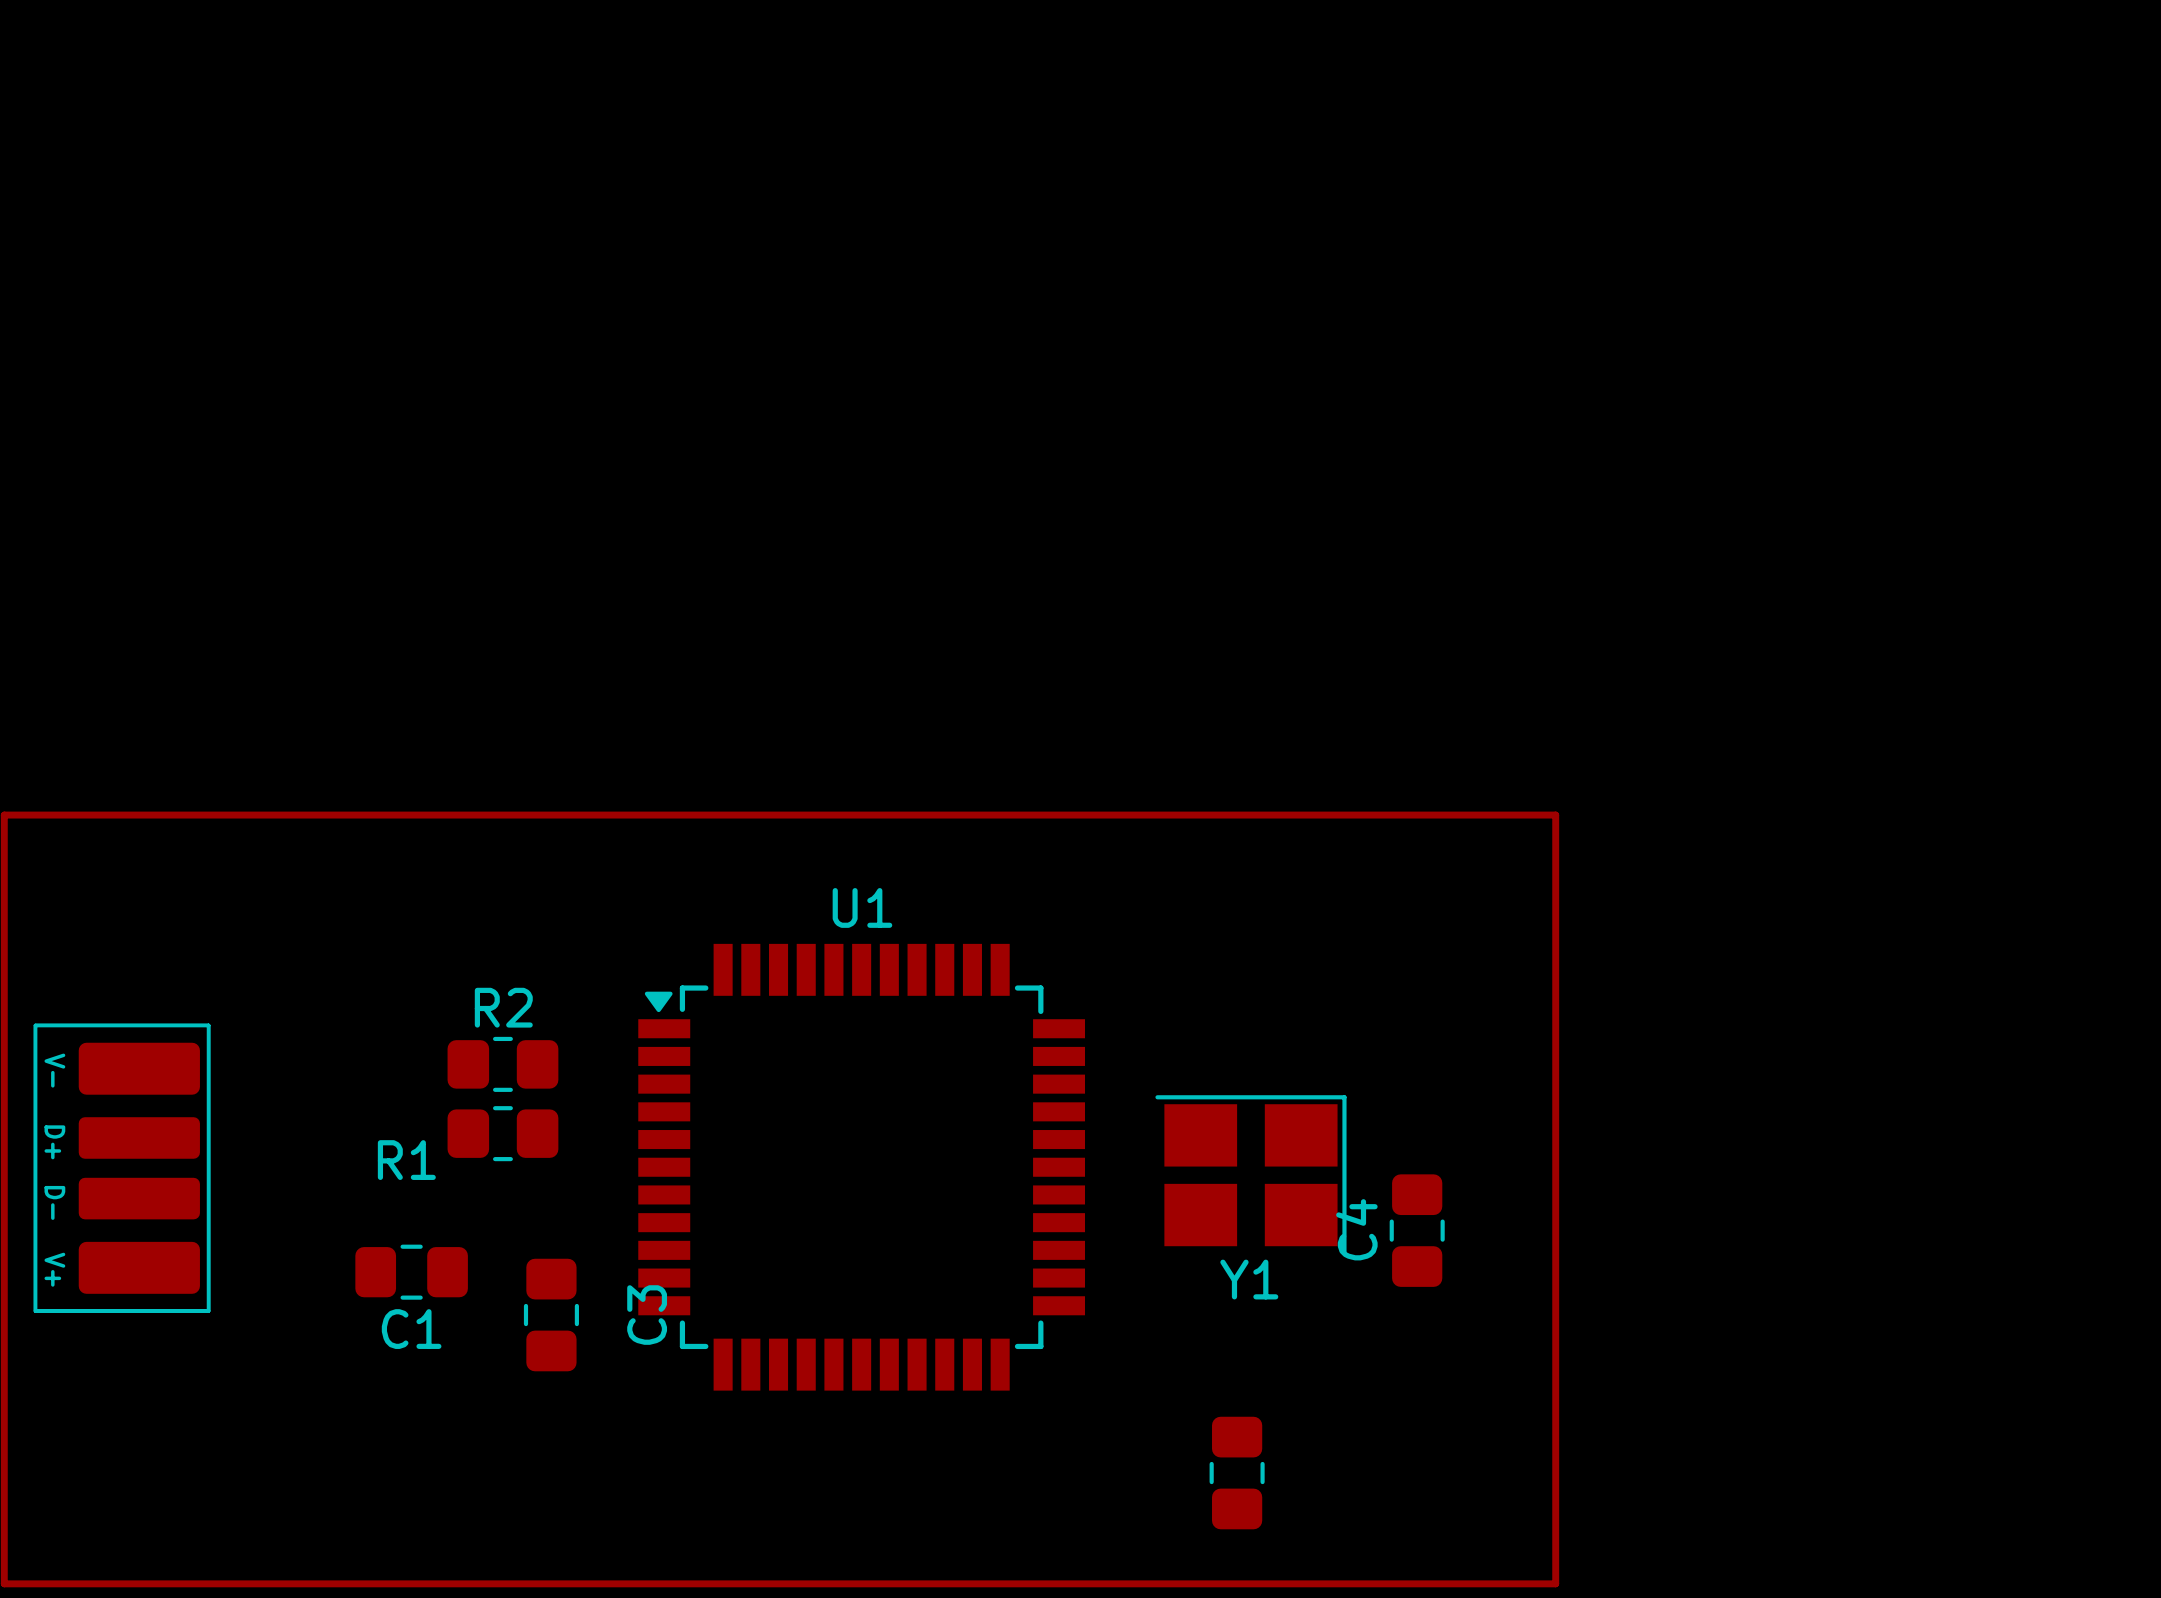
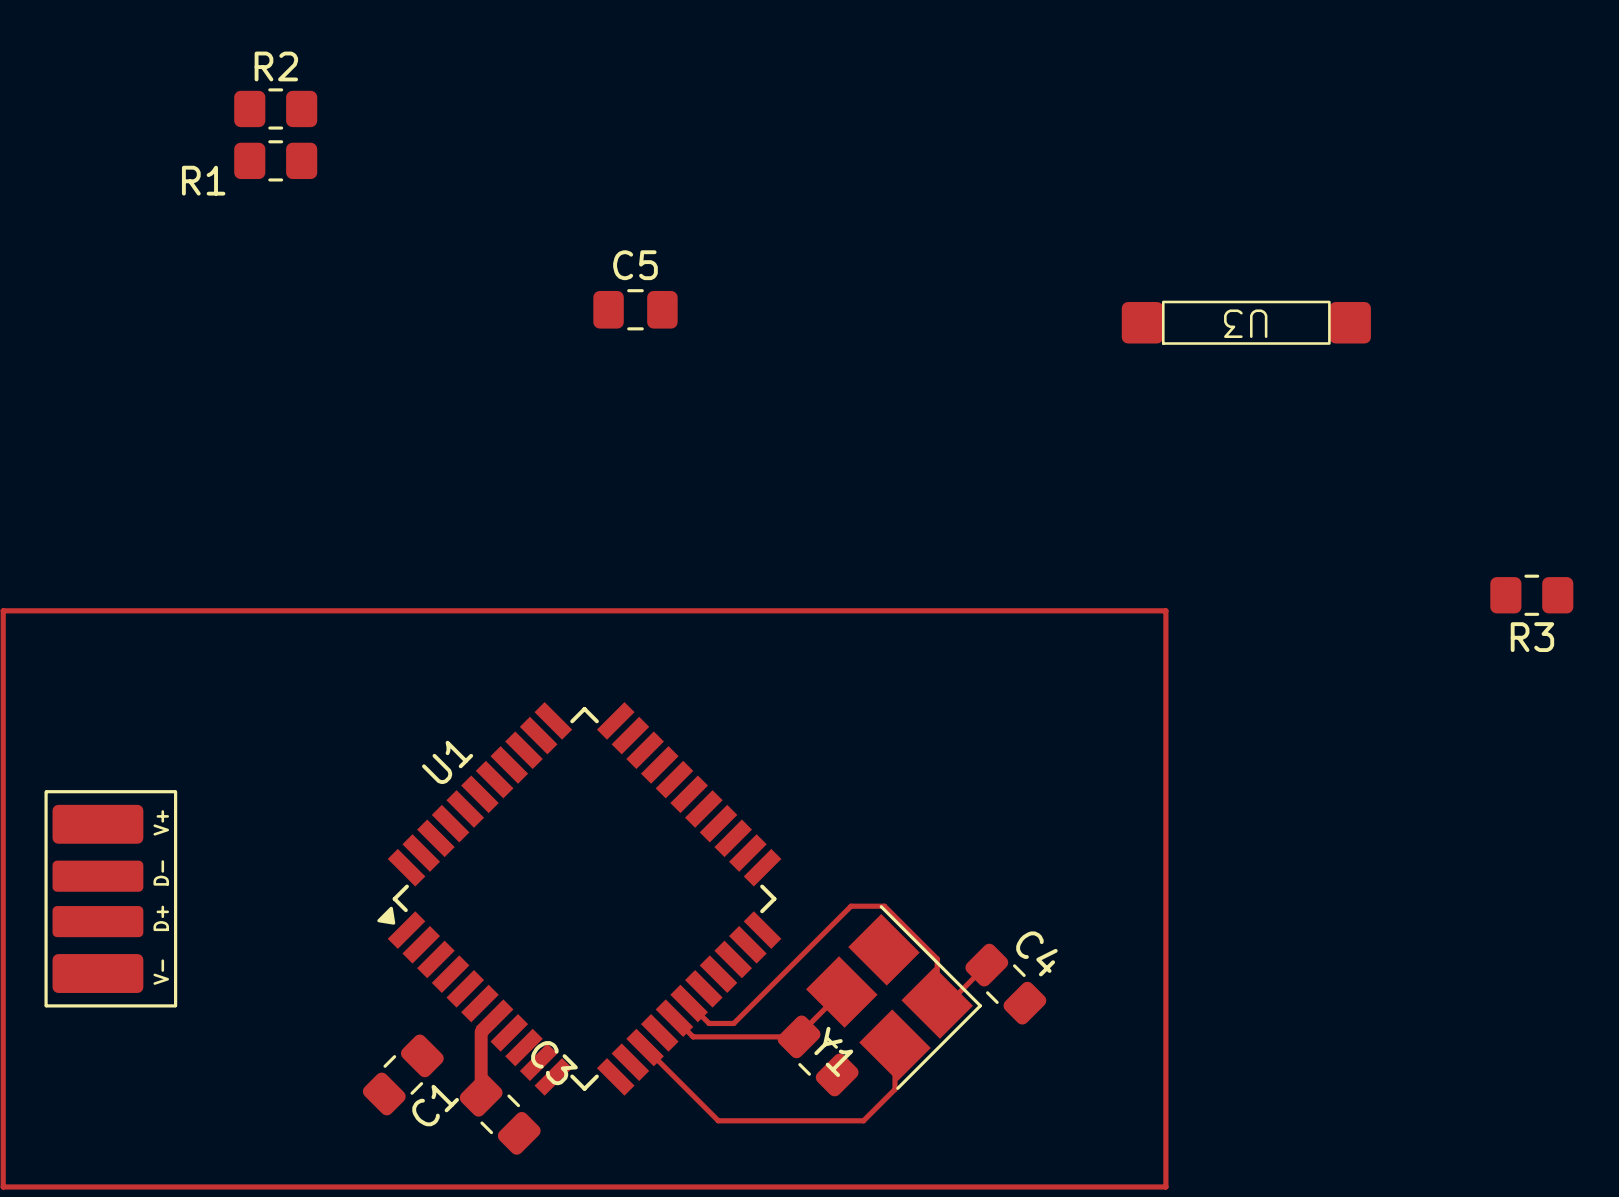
C5: none -> (635, 309)
U3: none -> (1246, 322)
R3: none -> (1531, 595)
R2 position: (502, 1064) -> (275, 108)
R1 position: (502, 1133) -> (275, 160)
U1 rotation: 0° (861, 1167) -> 45° counterclockwise (579, 898)
part rotation: 0° (122, 1168) -> 180° (110, 898)
Y1 rotation: 0° (1250, 1175) -> 45° clockwise (893, 997)
Y1 position: (1250, 1175) -> (893, 997)
C4 name position: C4 (1356, 1229) -> C4 (1036, 953)
C4 rotation: 0° (1417, 1230) -> 45° counterclockwise (1005, 984)
C4 position: (1417, 1230) -> (1005, 984)
C1 rotation: 0° (411, 1272) -> 45° counterclockwise (403, 1074)
C1 position: (411, 1272) -> (403, 1074)
track: none -> (986, 965) (948, 1003) (937, 1003) (937, 958) (884, 906) (851, 906) (733, 1023) (709, 1023) (689, 1003) (694, 1003)
C3 rotation: 0° (551, 1315) -> 45° counterclockwise (500, 1114)
C3 position: (551, 1315) -> (500, 1114)
track: none -> (841, 992) (799, 1036) (693, 1036) (674, 1018)
track: none -> (494, 1018) (481, 1031) (481, 1095)
track: none -> (895, 1045) (895, 1089) (863, 1120) (718, 1120) (645, 1047)
part: none -> (818, 1055)
part: (1237, 1473) -> none

